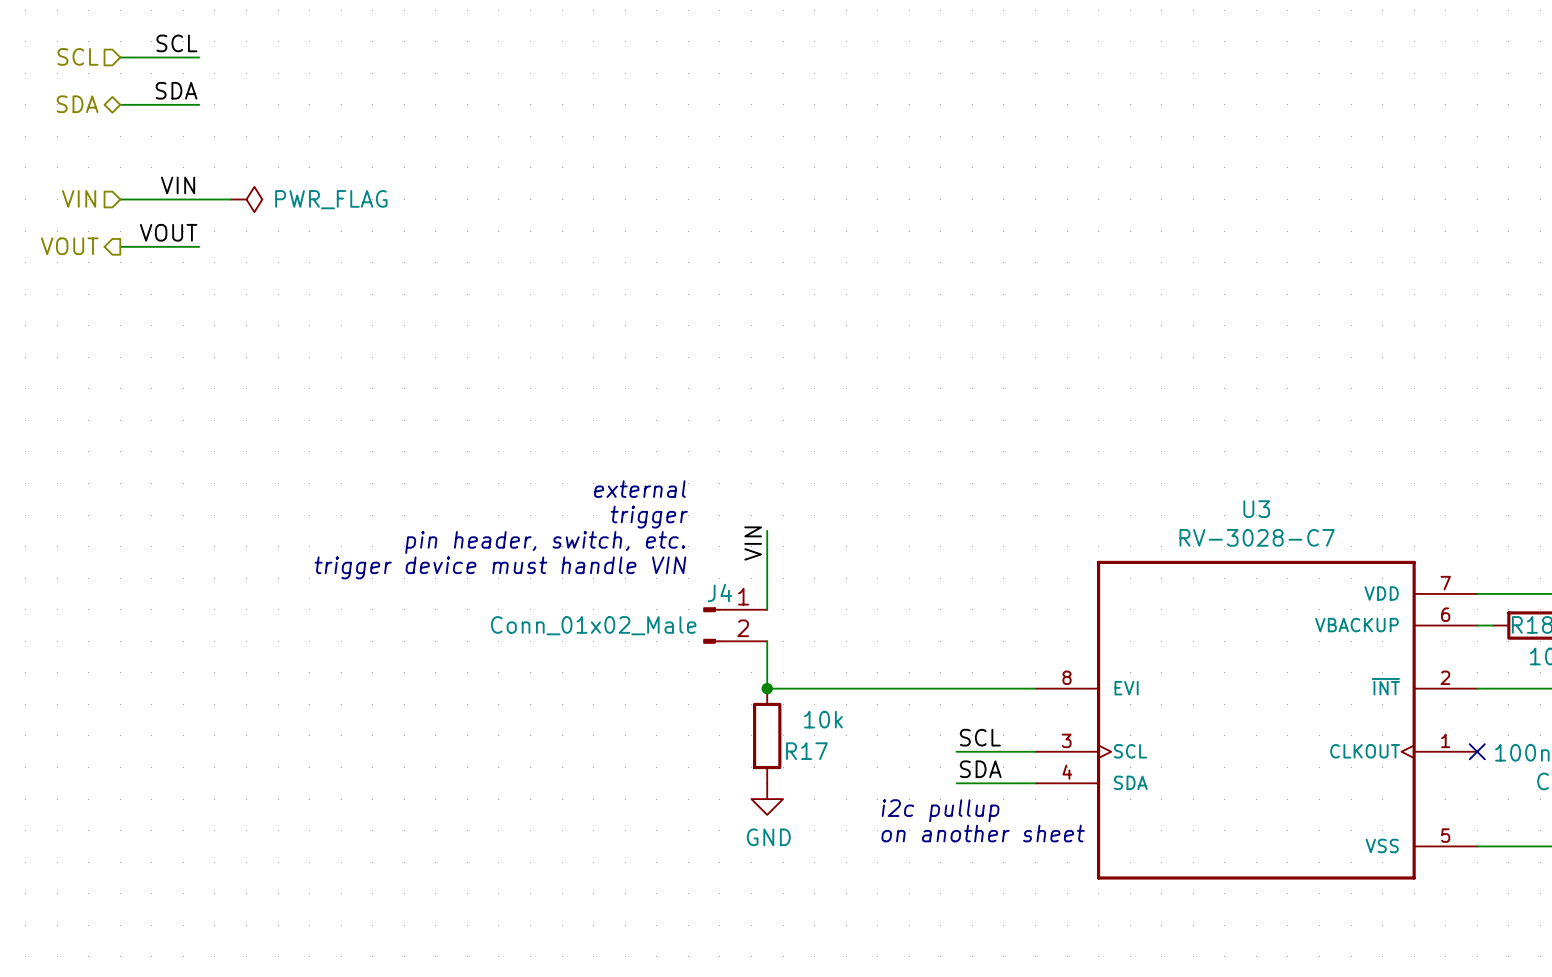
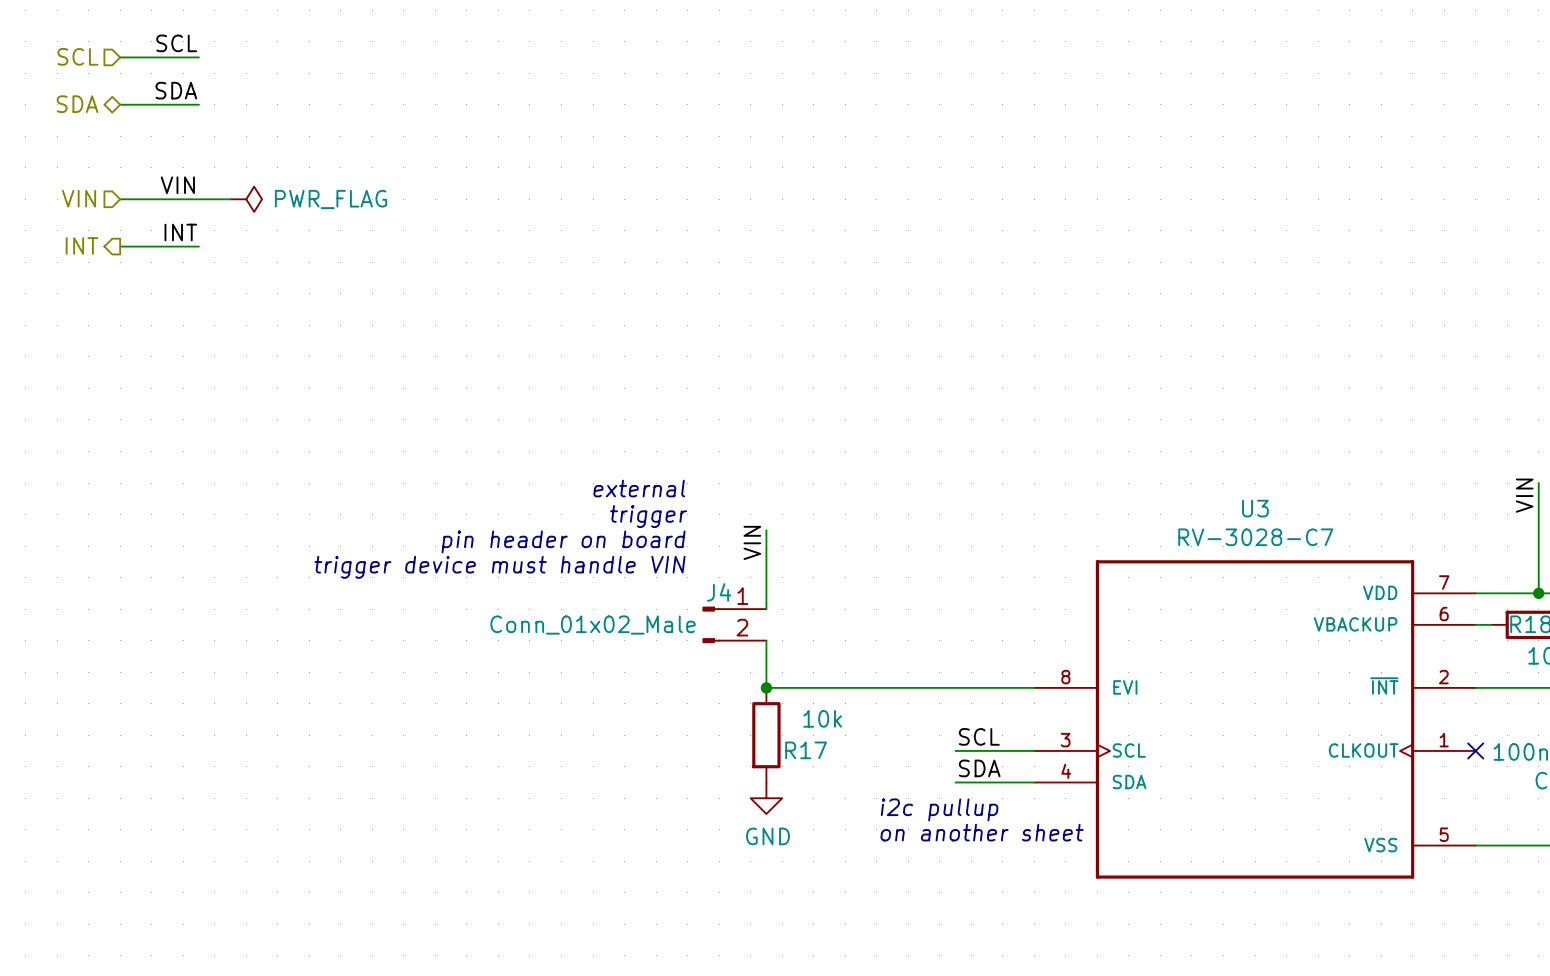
label: VOUT (168, 232) -> INT (180, 232)
hierarchical label: VOUT (69, 246) -> INT (82, 245)
wire: none -> (1538, 483) (1538, 593)
label: none -> VIN (1524, 495)
text: pin header, switch, etc. (545, 542) -> pin header on board (563, 541)
junction: none -> (1538, 593)

